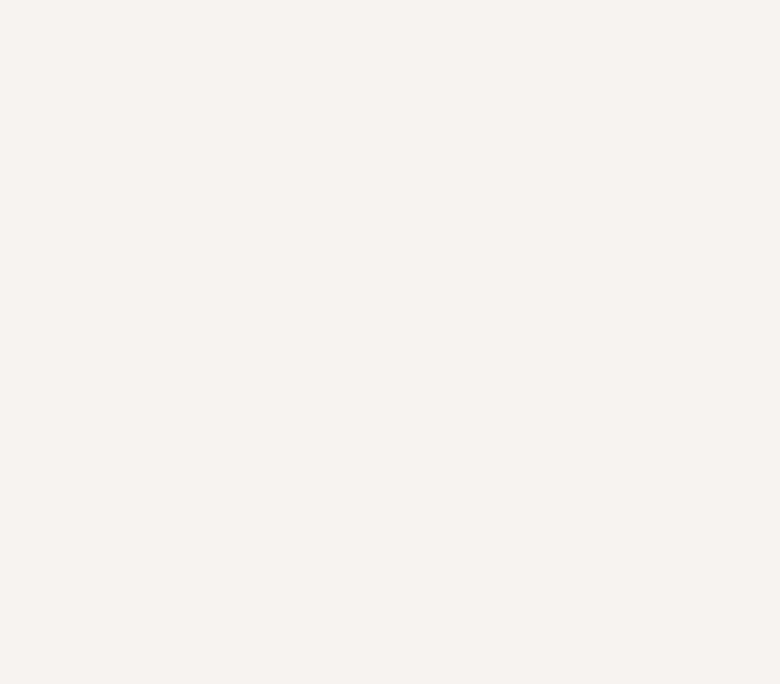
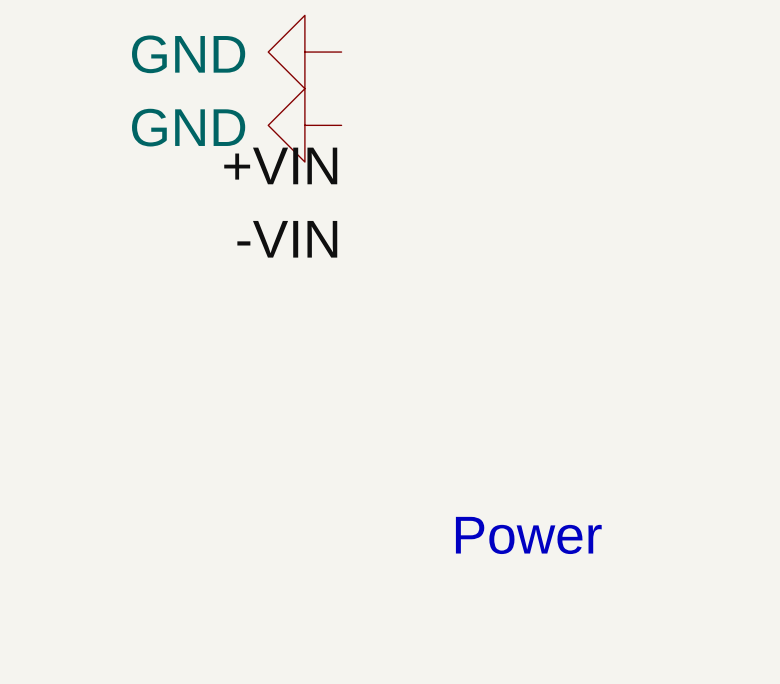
power symbol: none -> GND (304, 52)
power symbol: none -> GND (304, 125)
label: none -> +VIN (280, 165)
label: none -> -VIN (287, 239)
text: none -> Power (528, 535)

